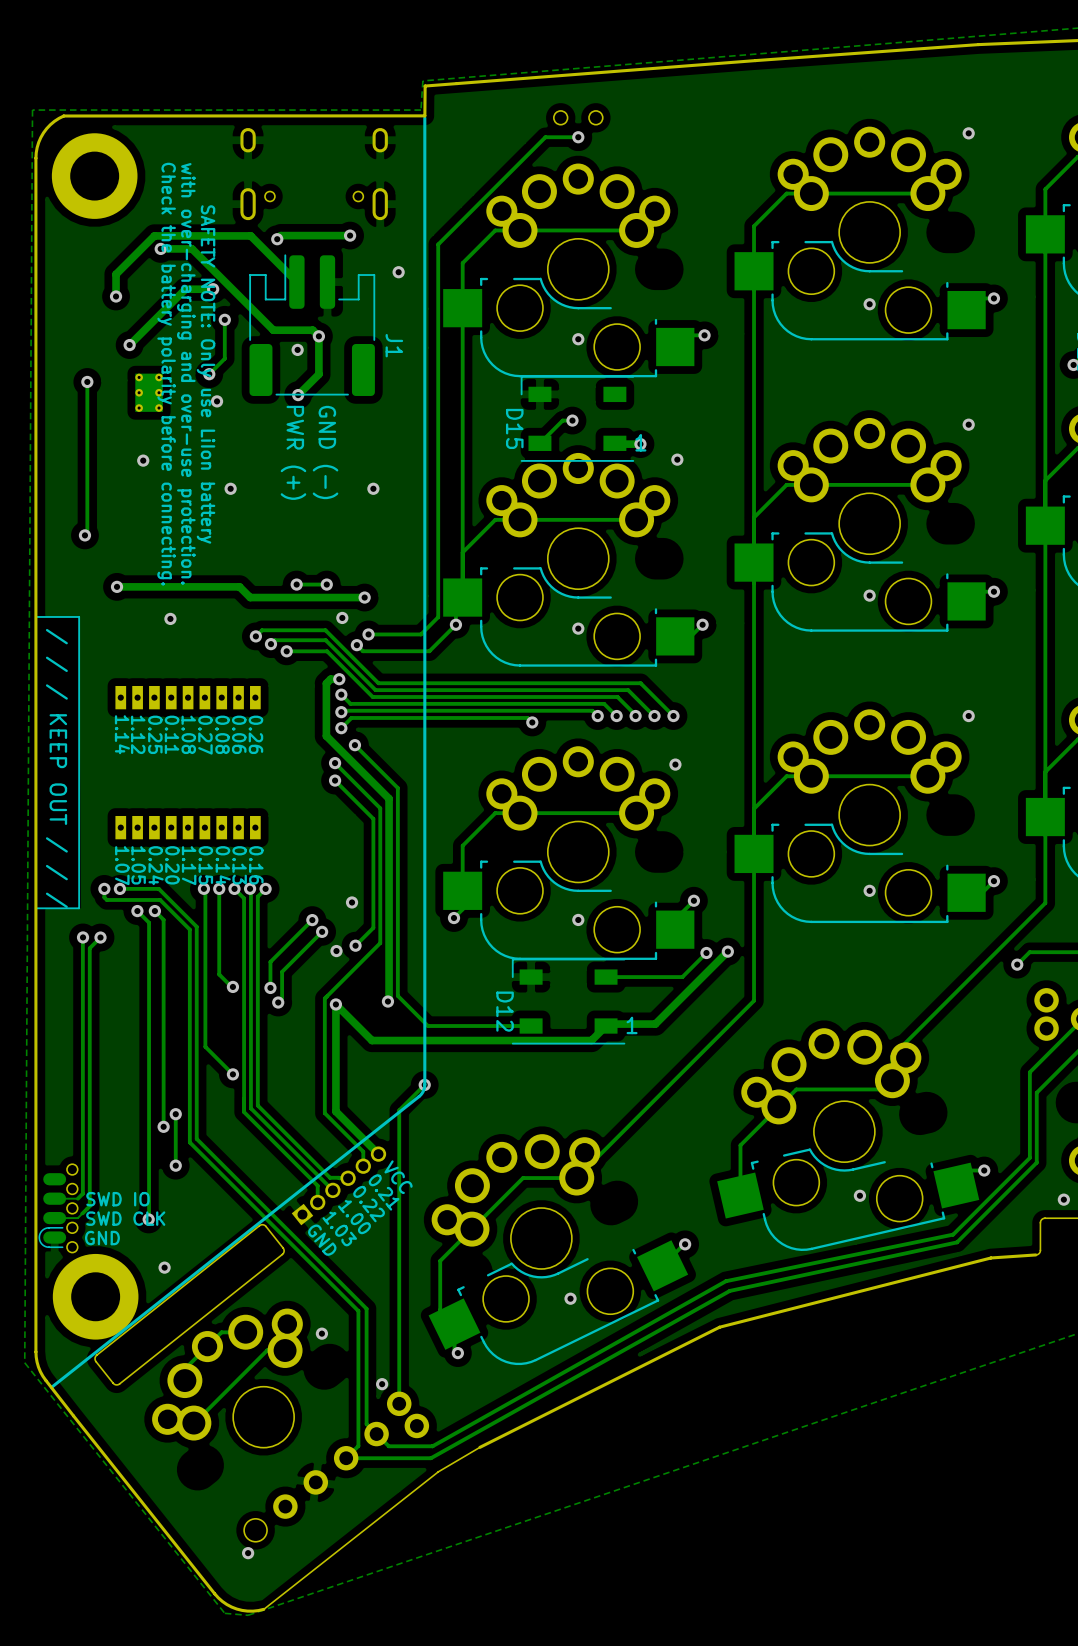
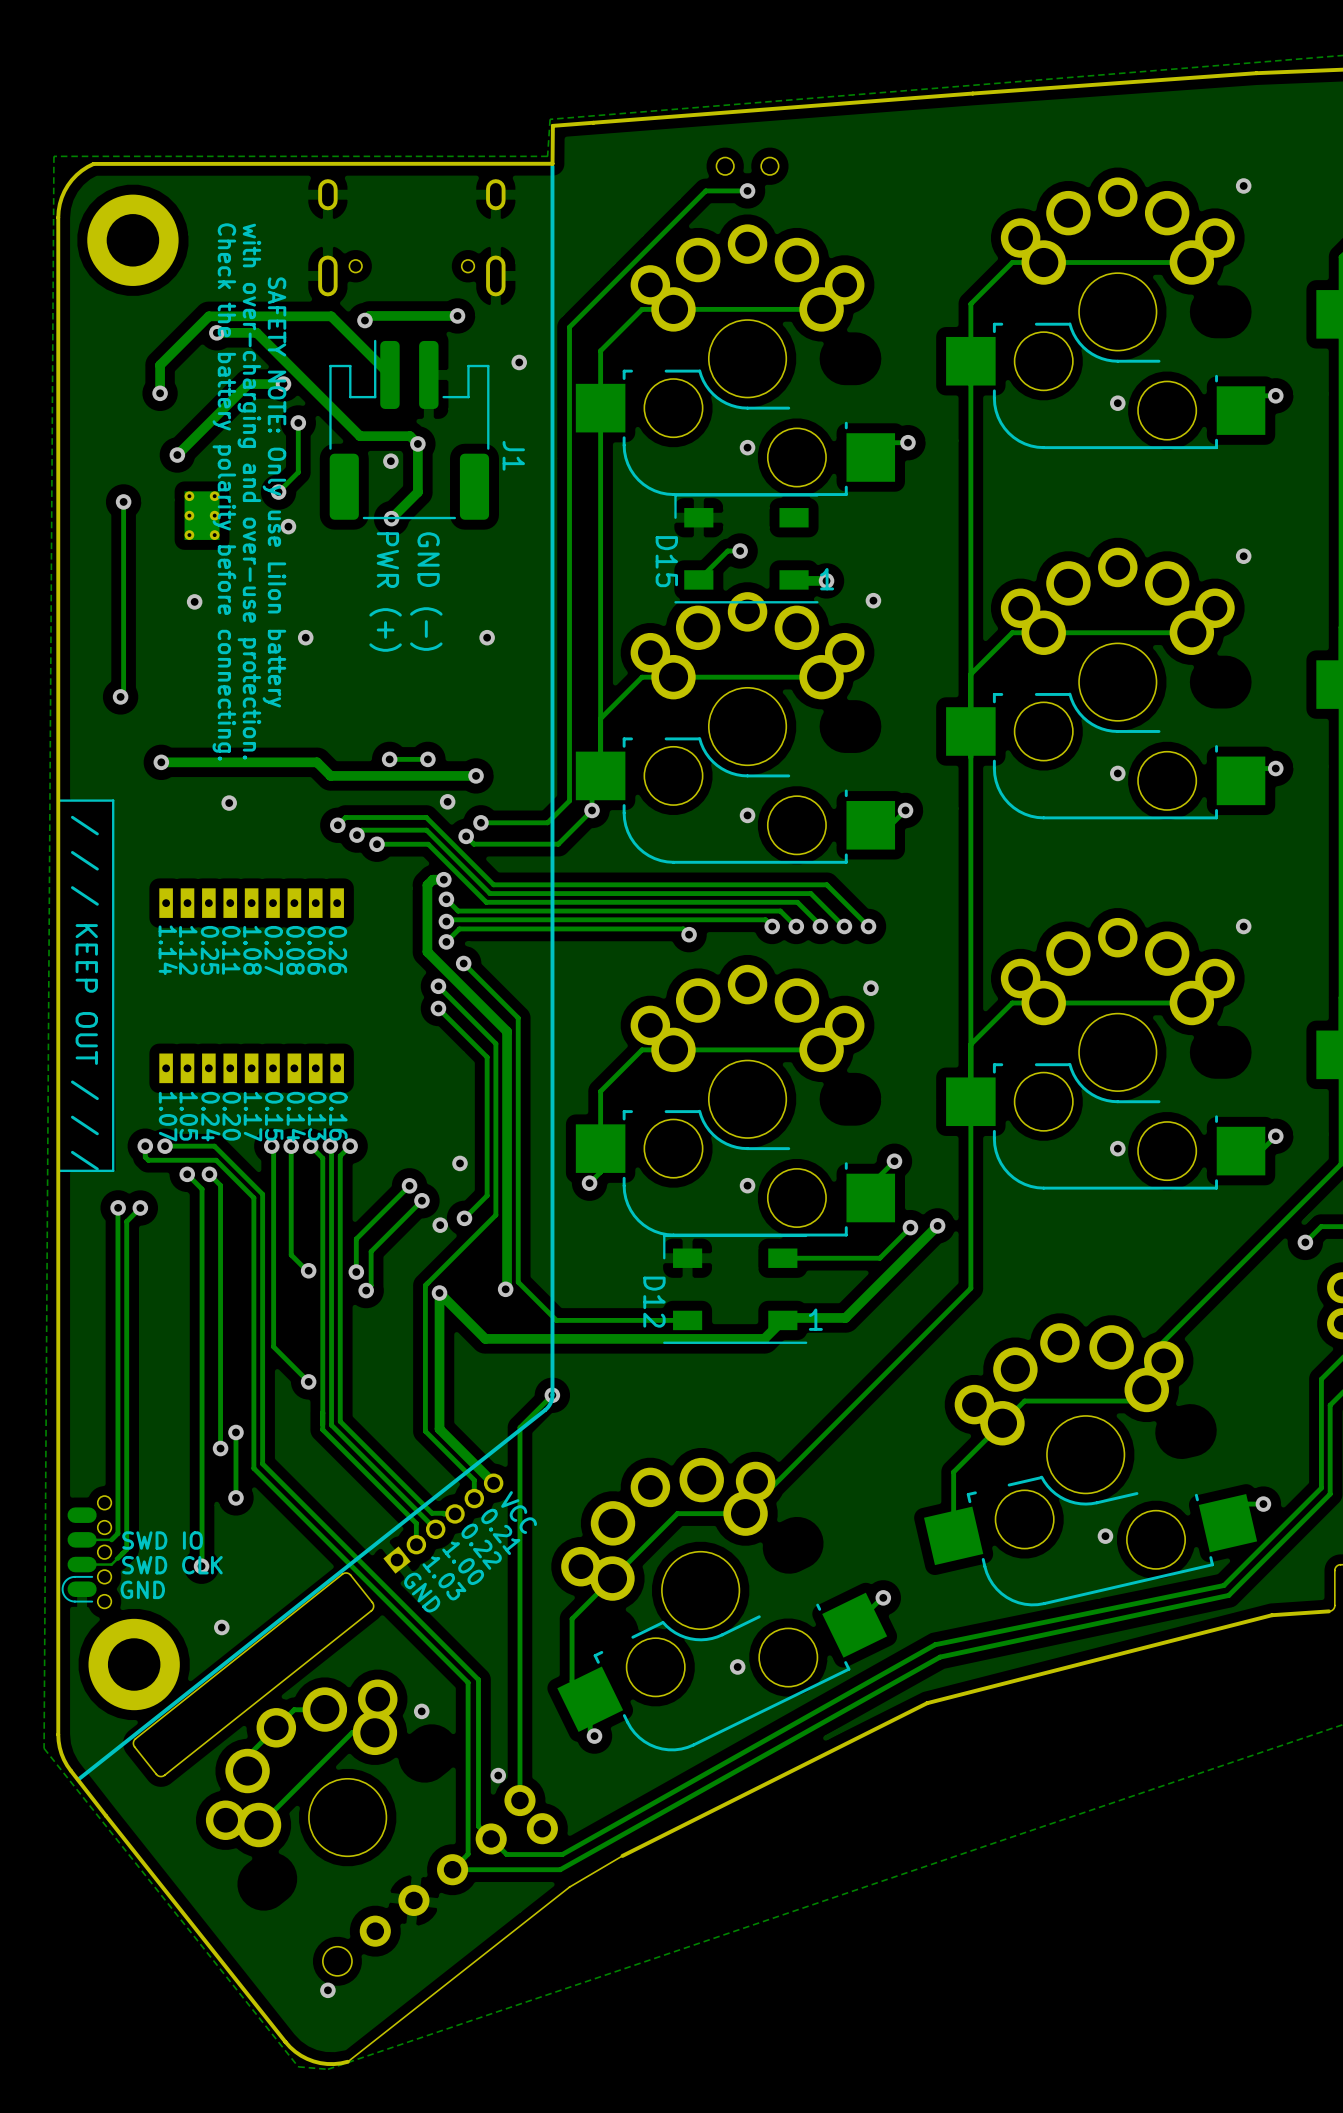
part footprint: [51, 133, 138, 219] -> [87, 194, 179, 286]
part footprint: [52, 1253, 139, 1340] -> [88, 1618, 180, 1711]

